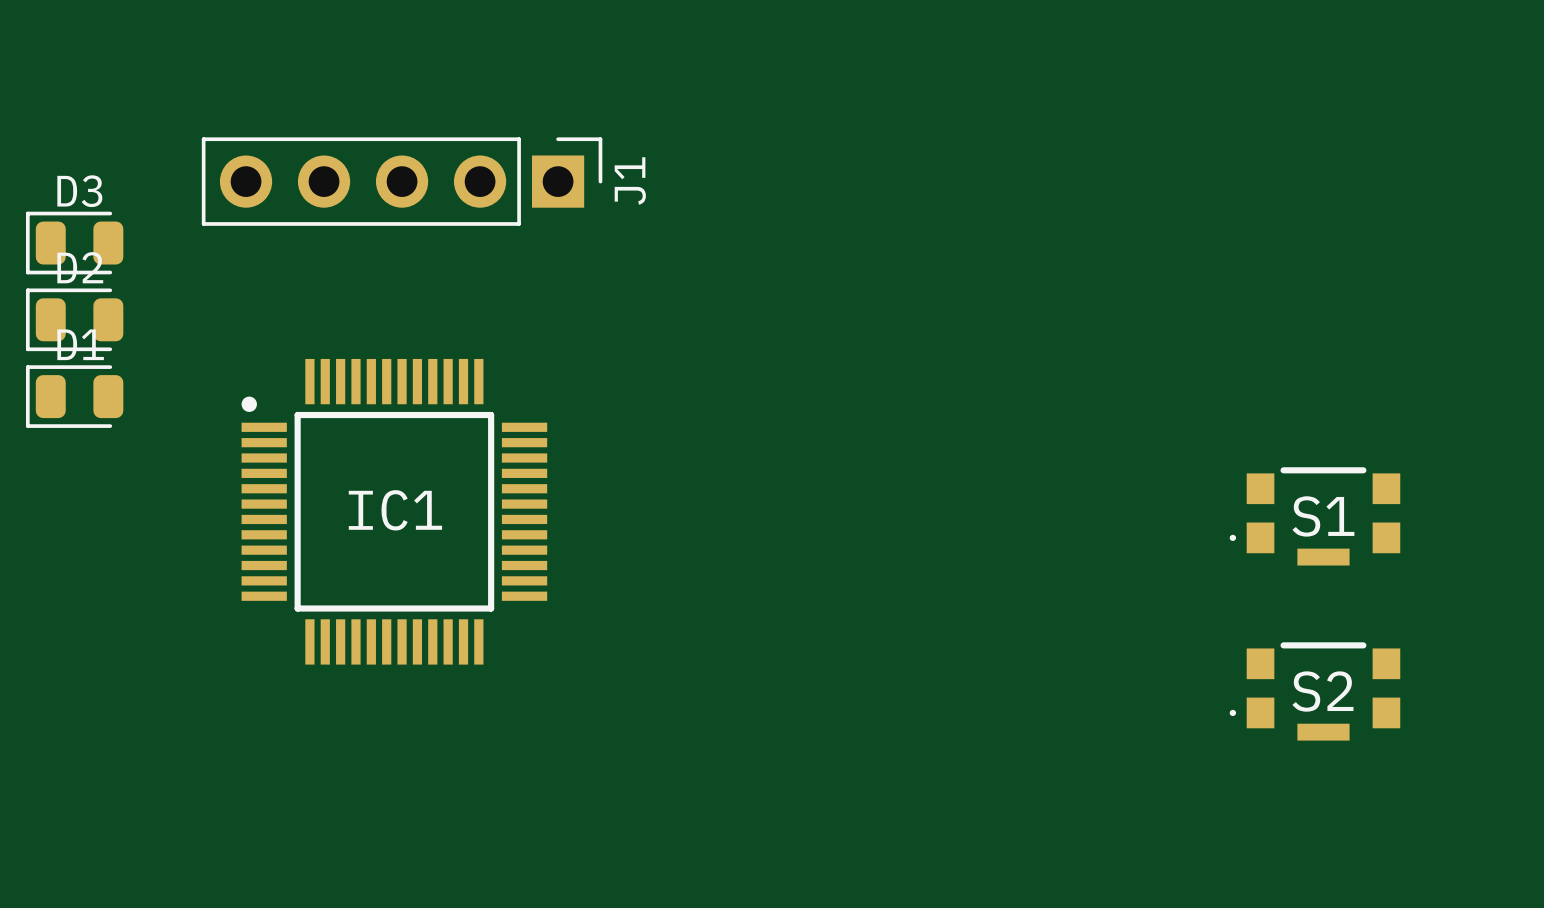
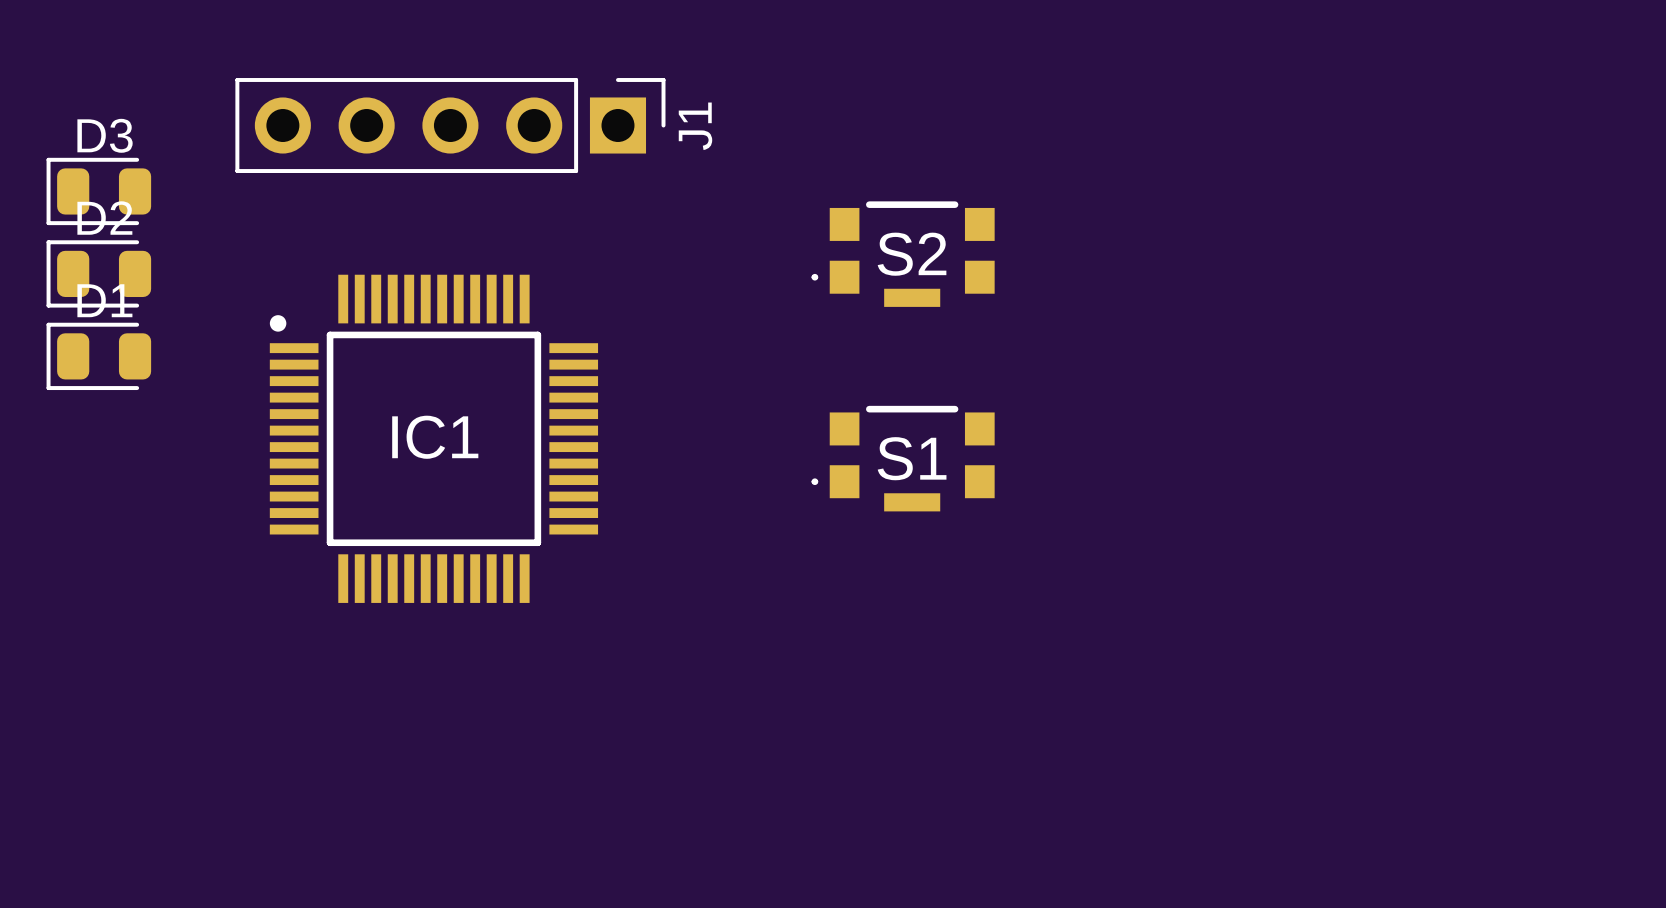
IC1 position: (394, 511) -> (433, 438)
S1 position: (1315, 516) -> (903, 458)
S2 position: (1315, 691) -> (903, 254)

